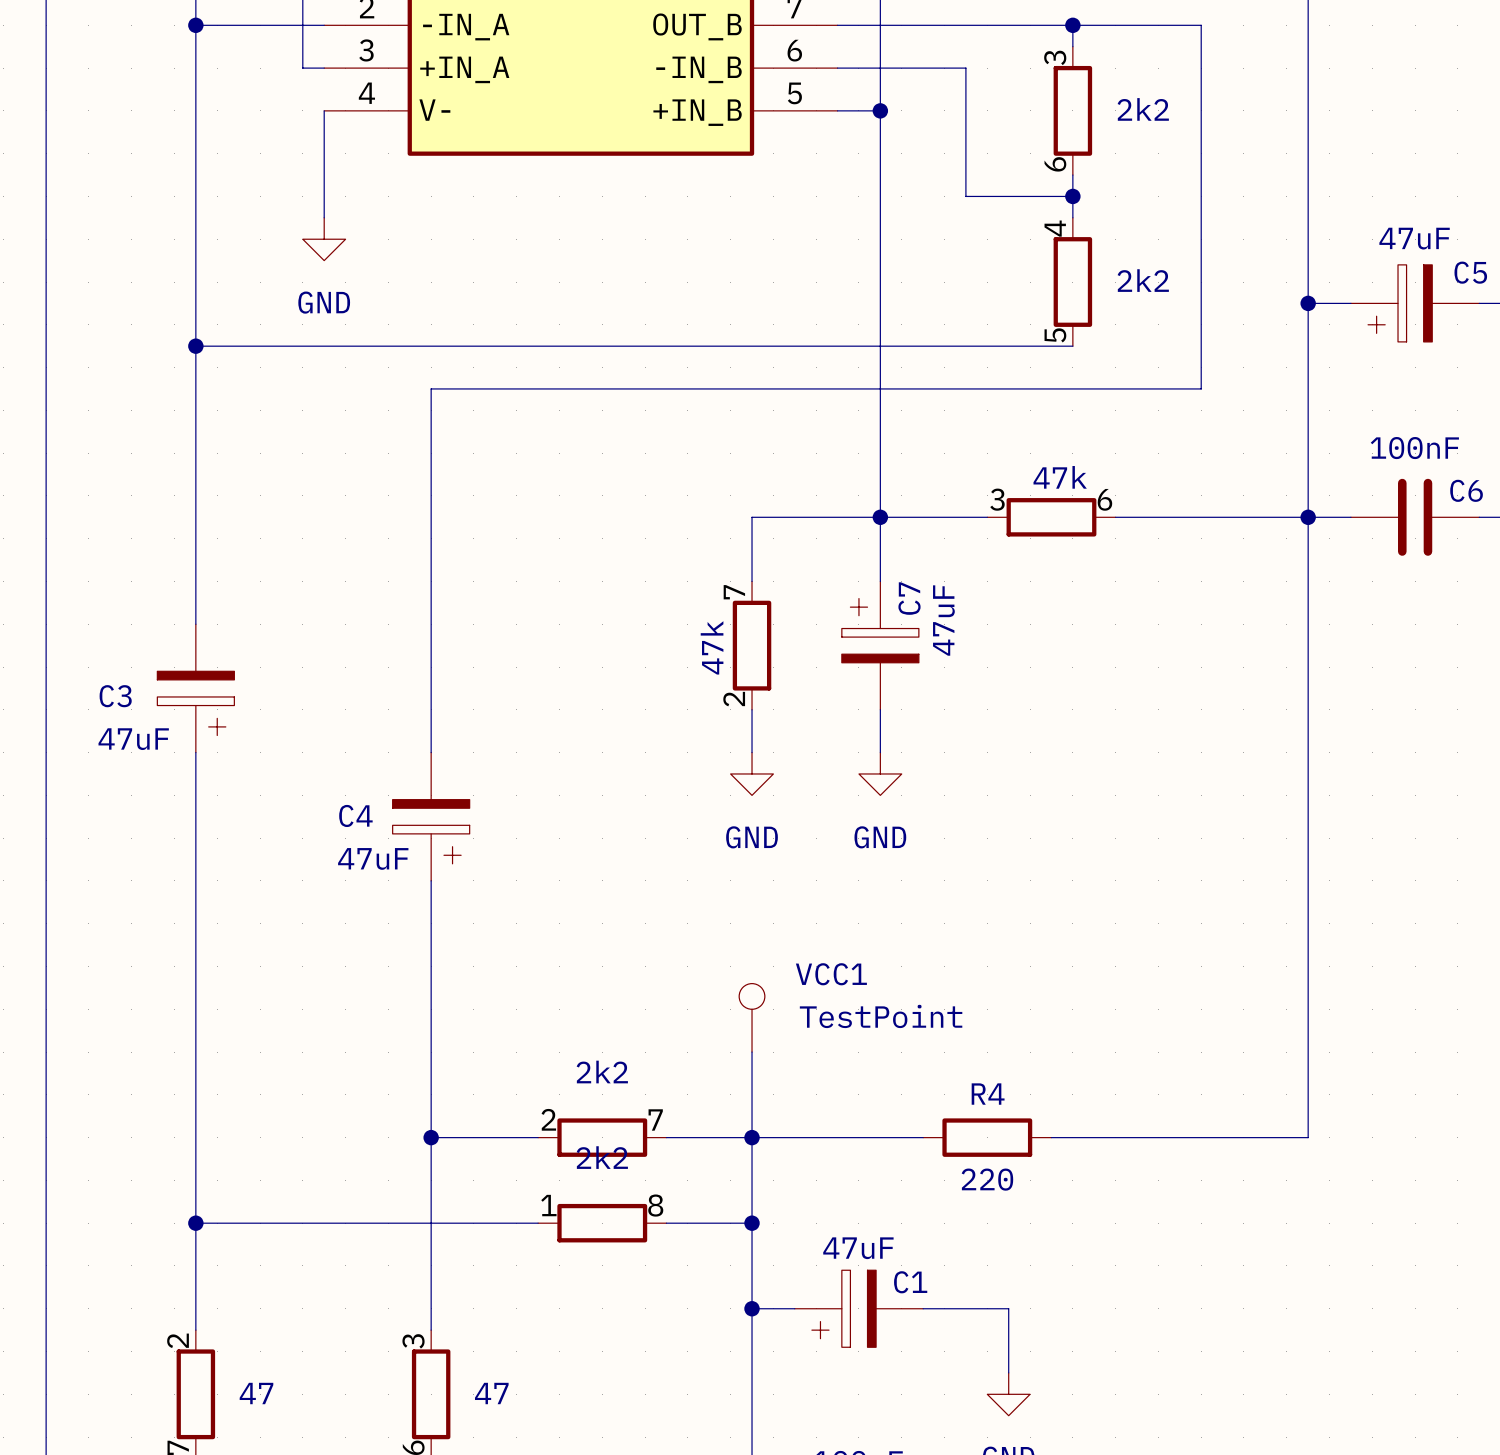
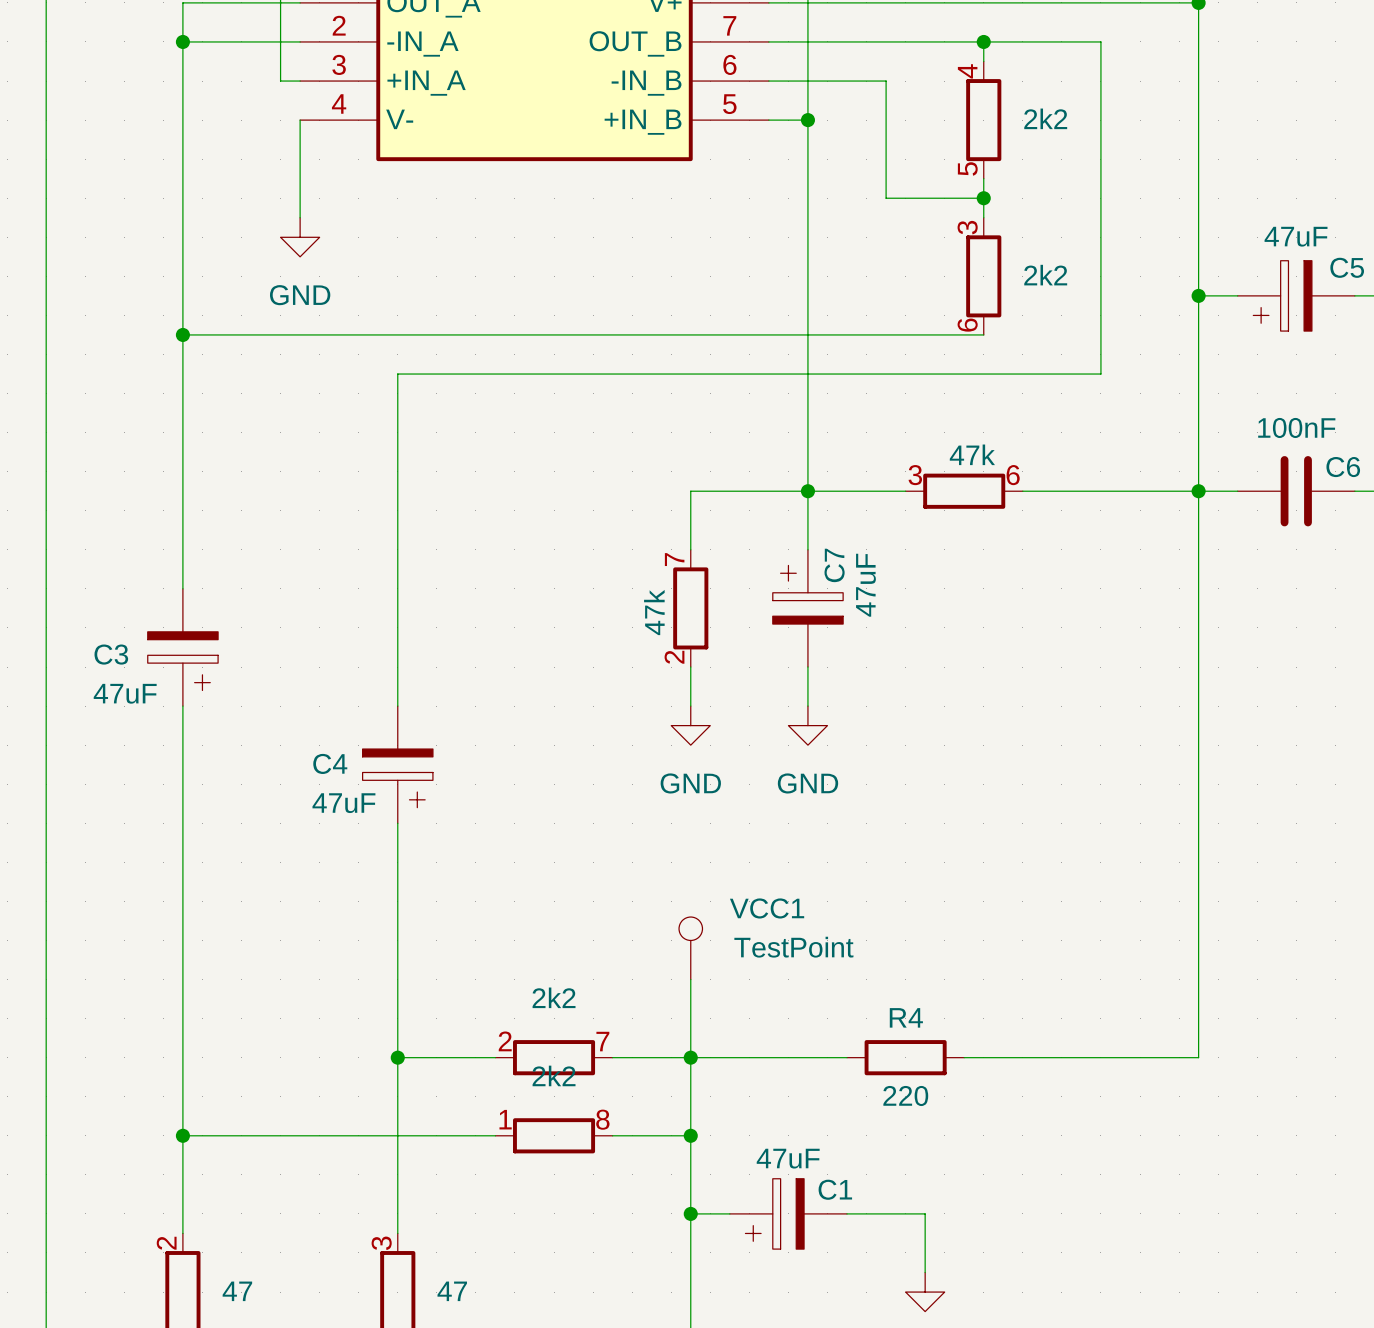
part pin number: 3 (1055, 57) -> 4 (967, 71)
part pin number: 6 (1055, 164) -> 5 (967, 168)
part pin number: 4 (1055, 228) -> 3 (967, 227)
part pin number: 5 (1055, 335) -> 6 (967, 325)

